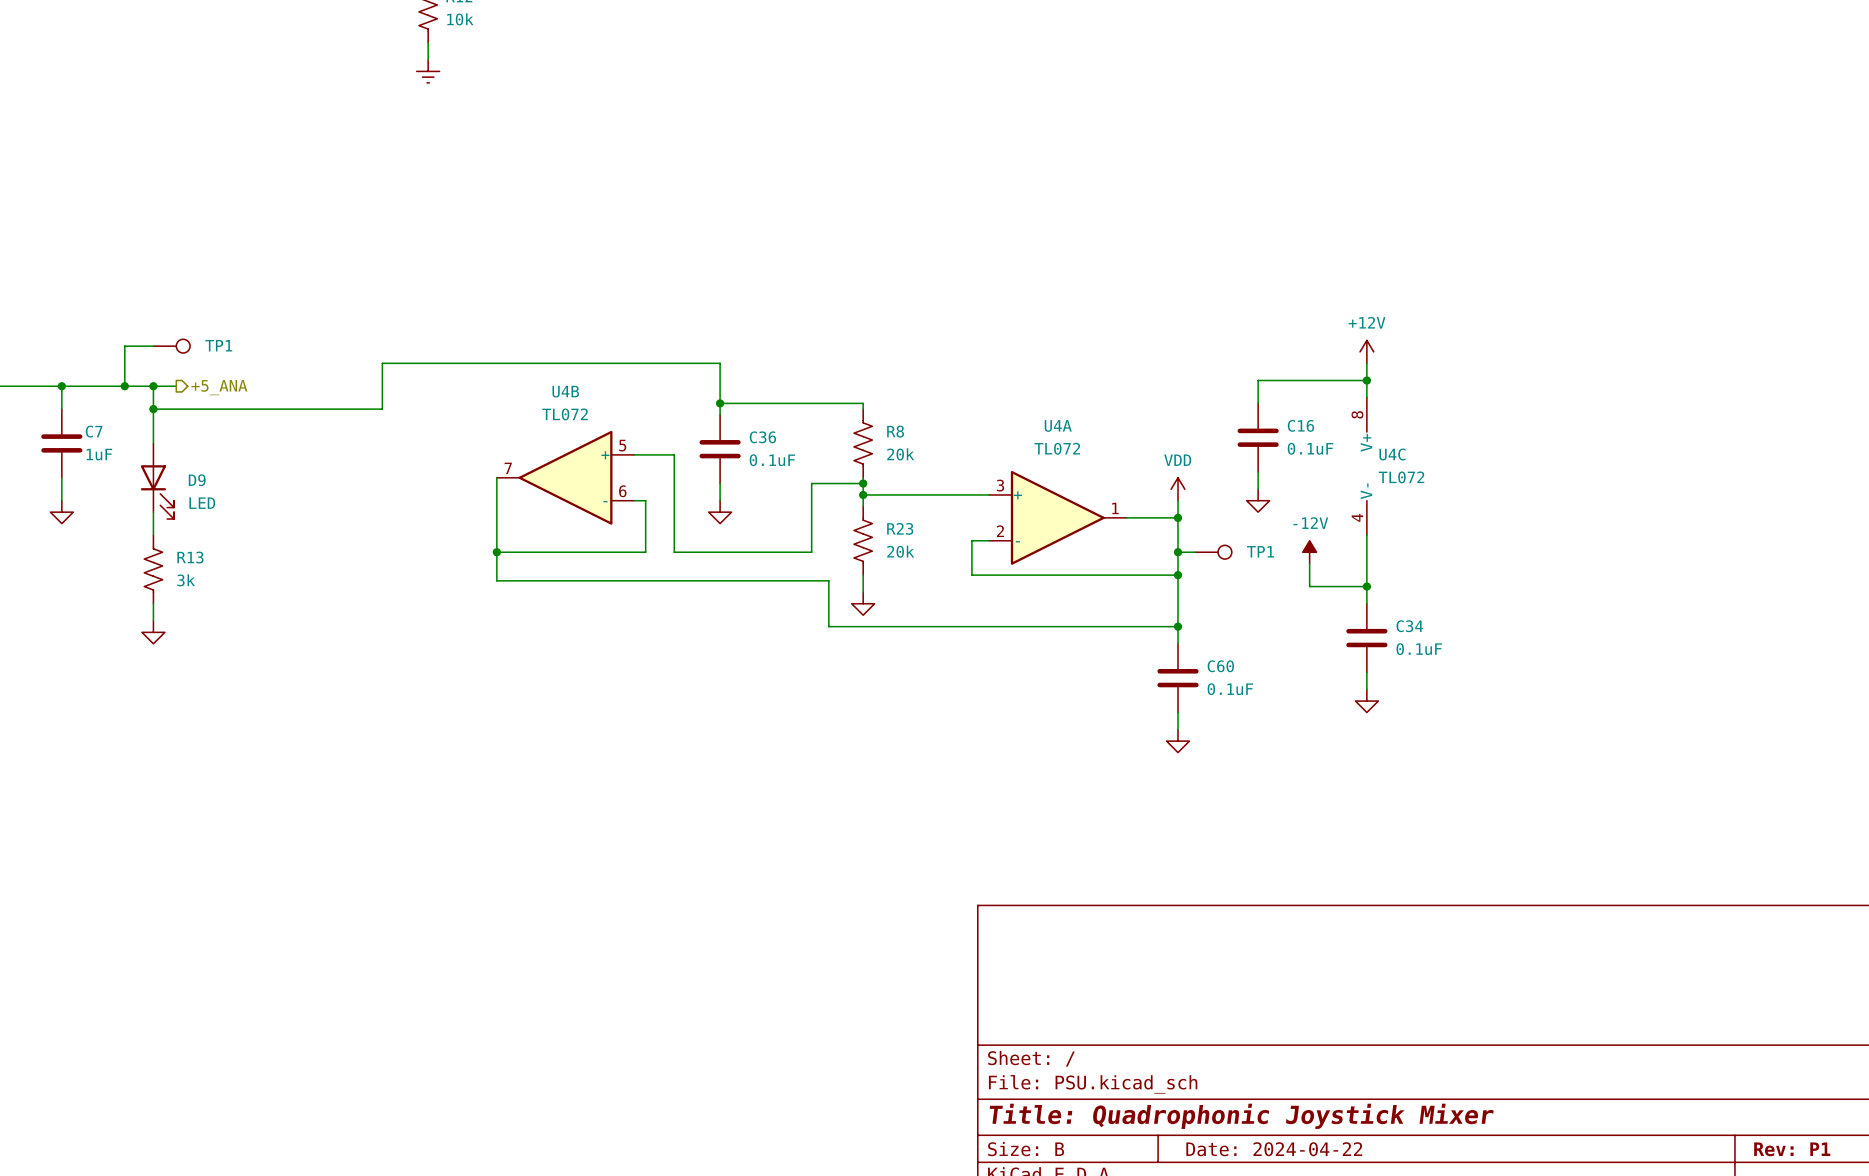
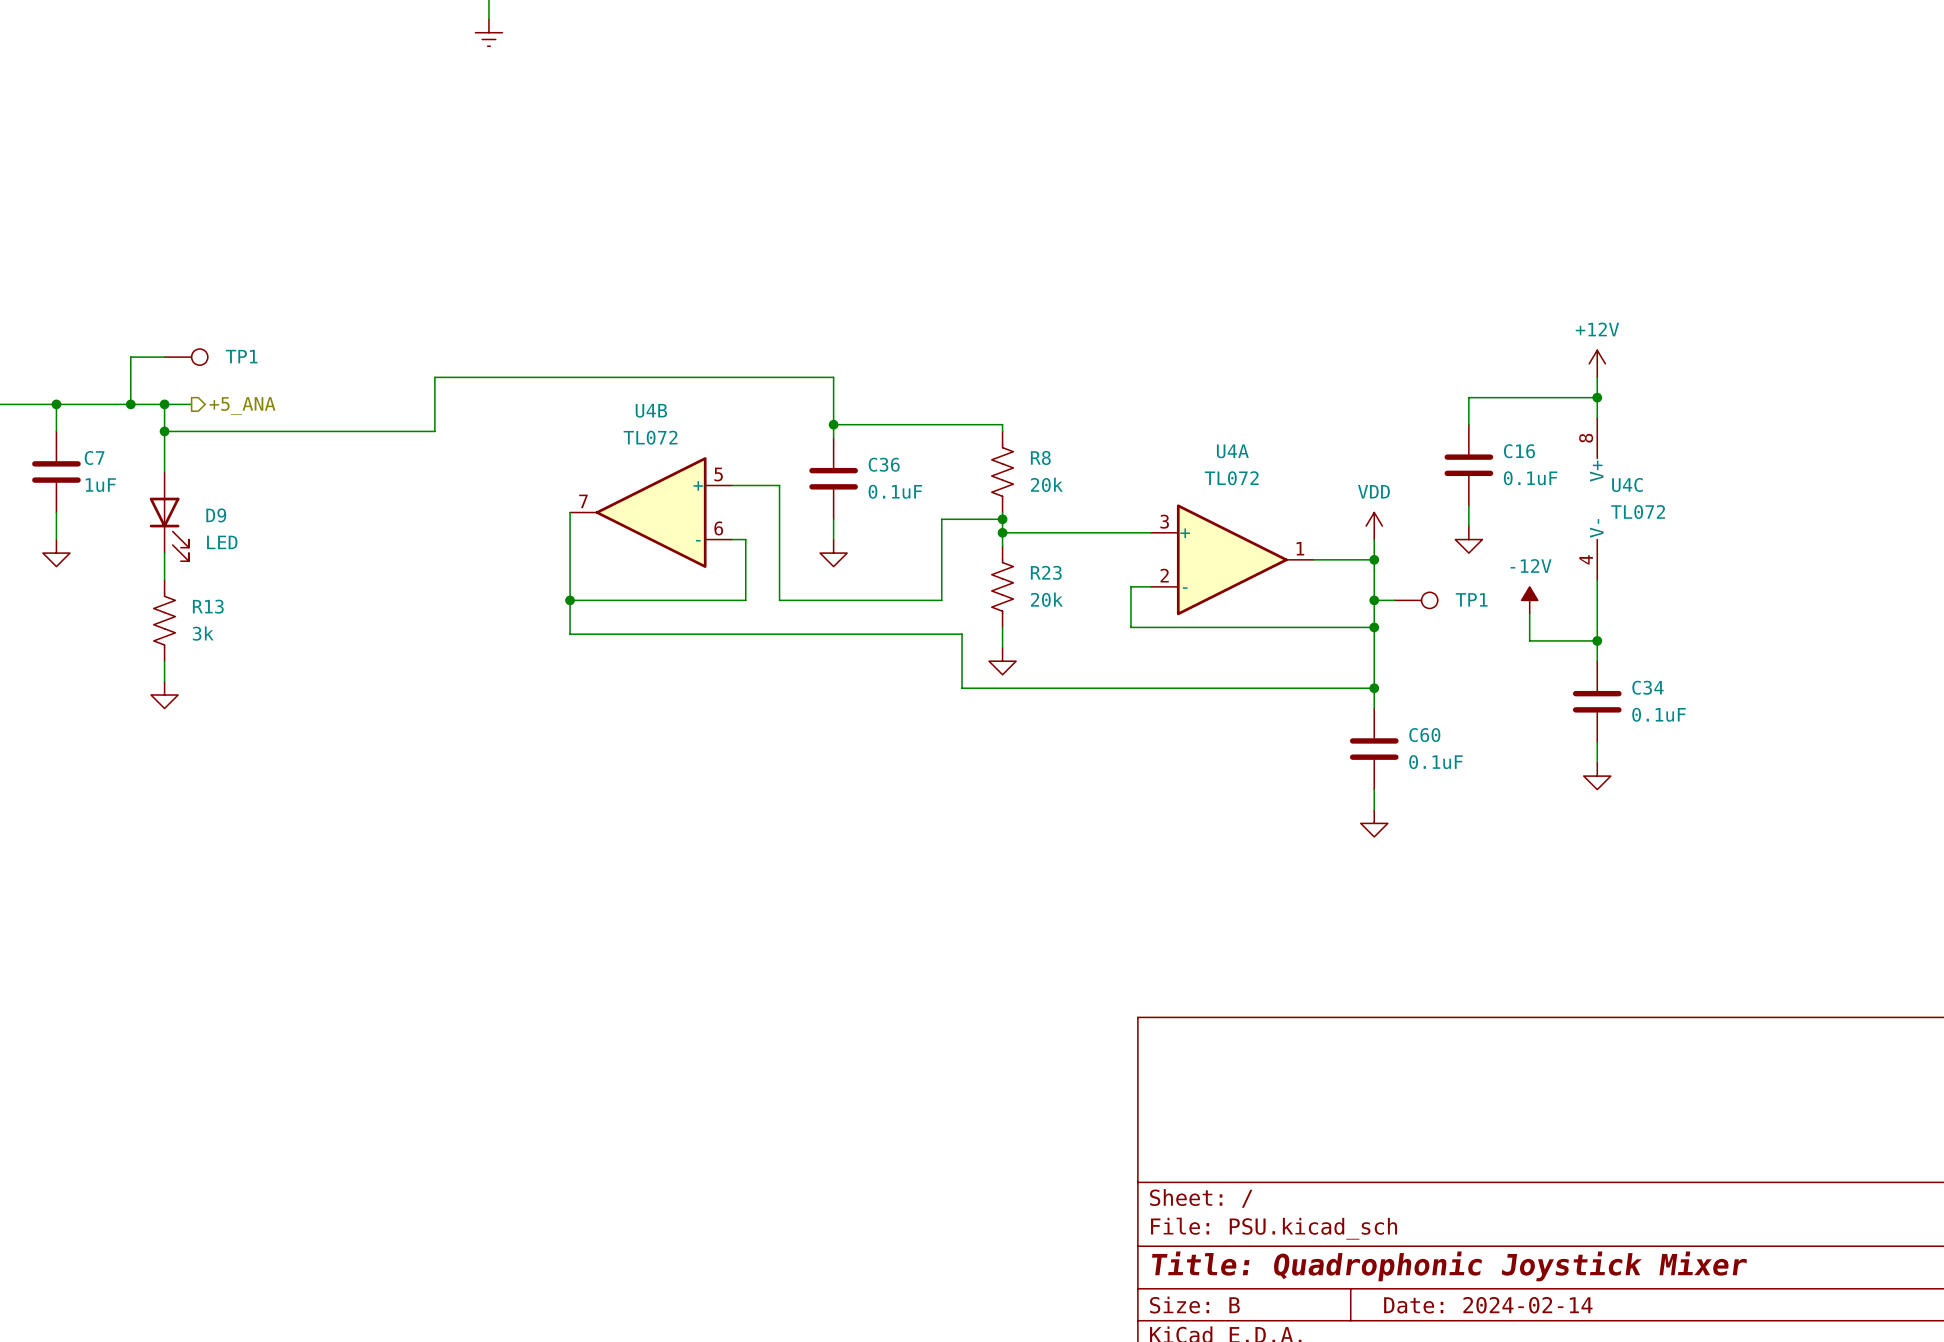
title block: Date: 2024-04-22 (1274, 1149) -> Date: 2024-02-14 (1488, 1305)

